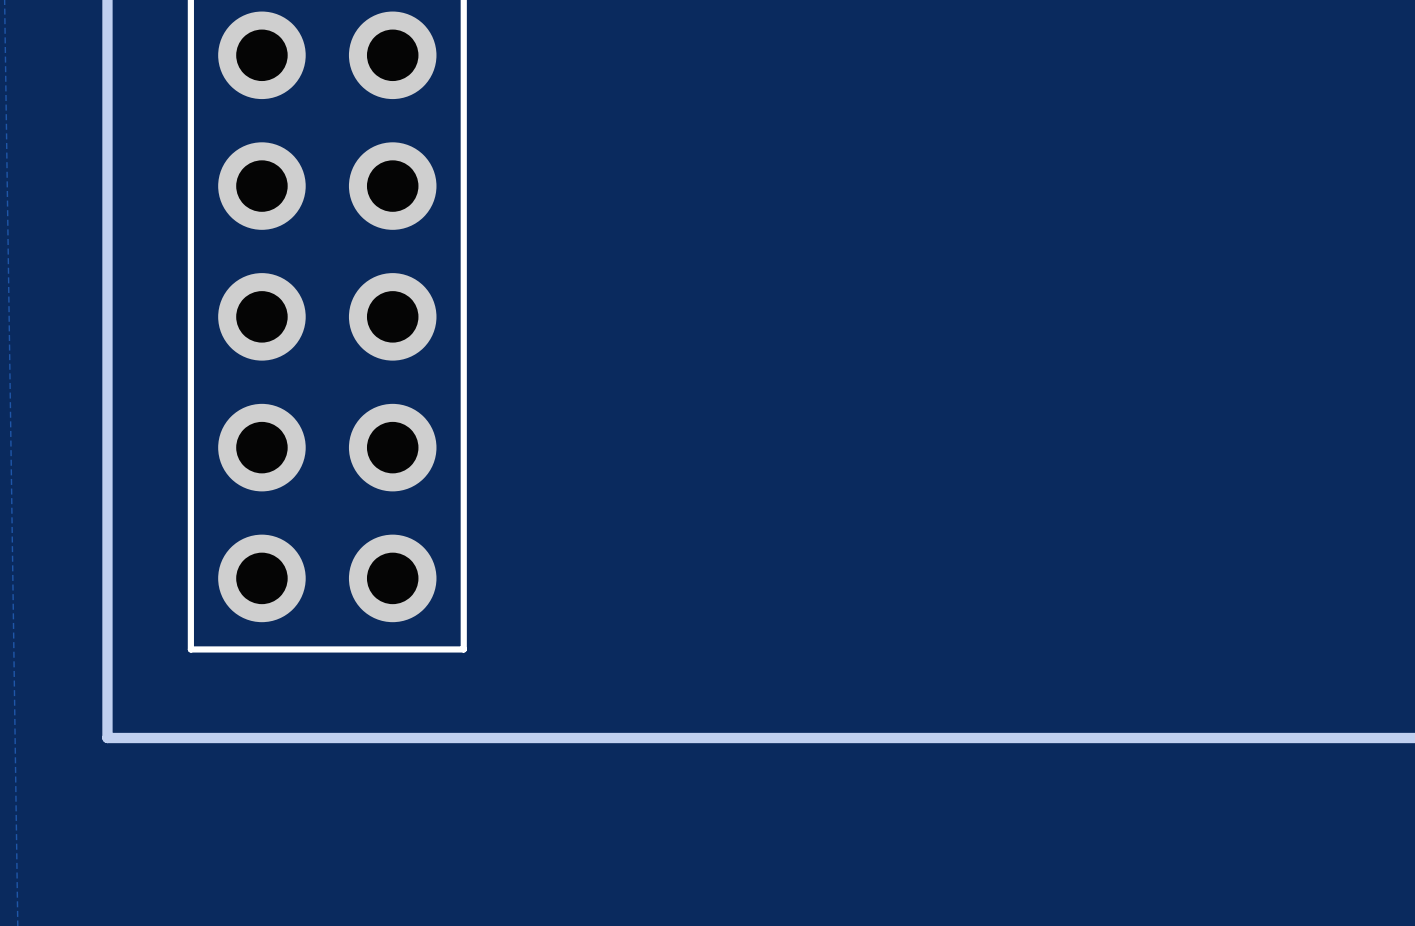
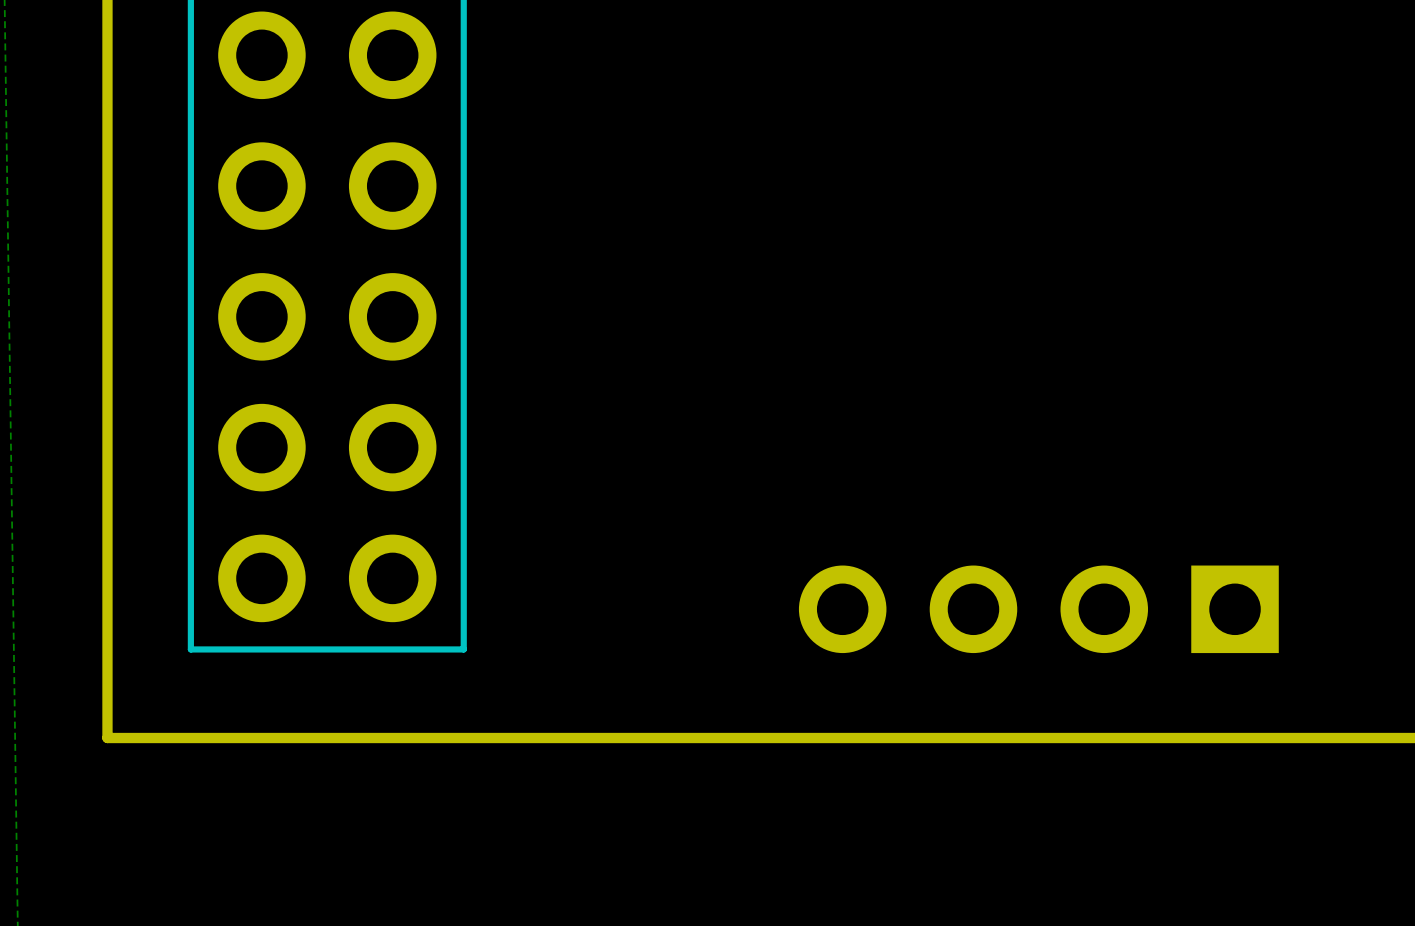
part: none -> (1038, 609)

